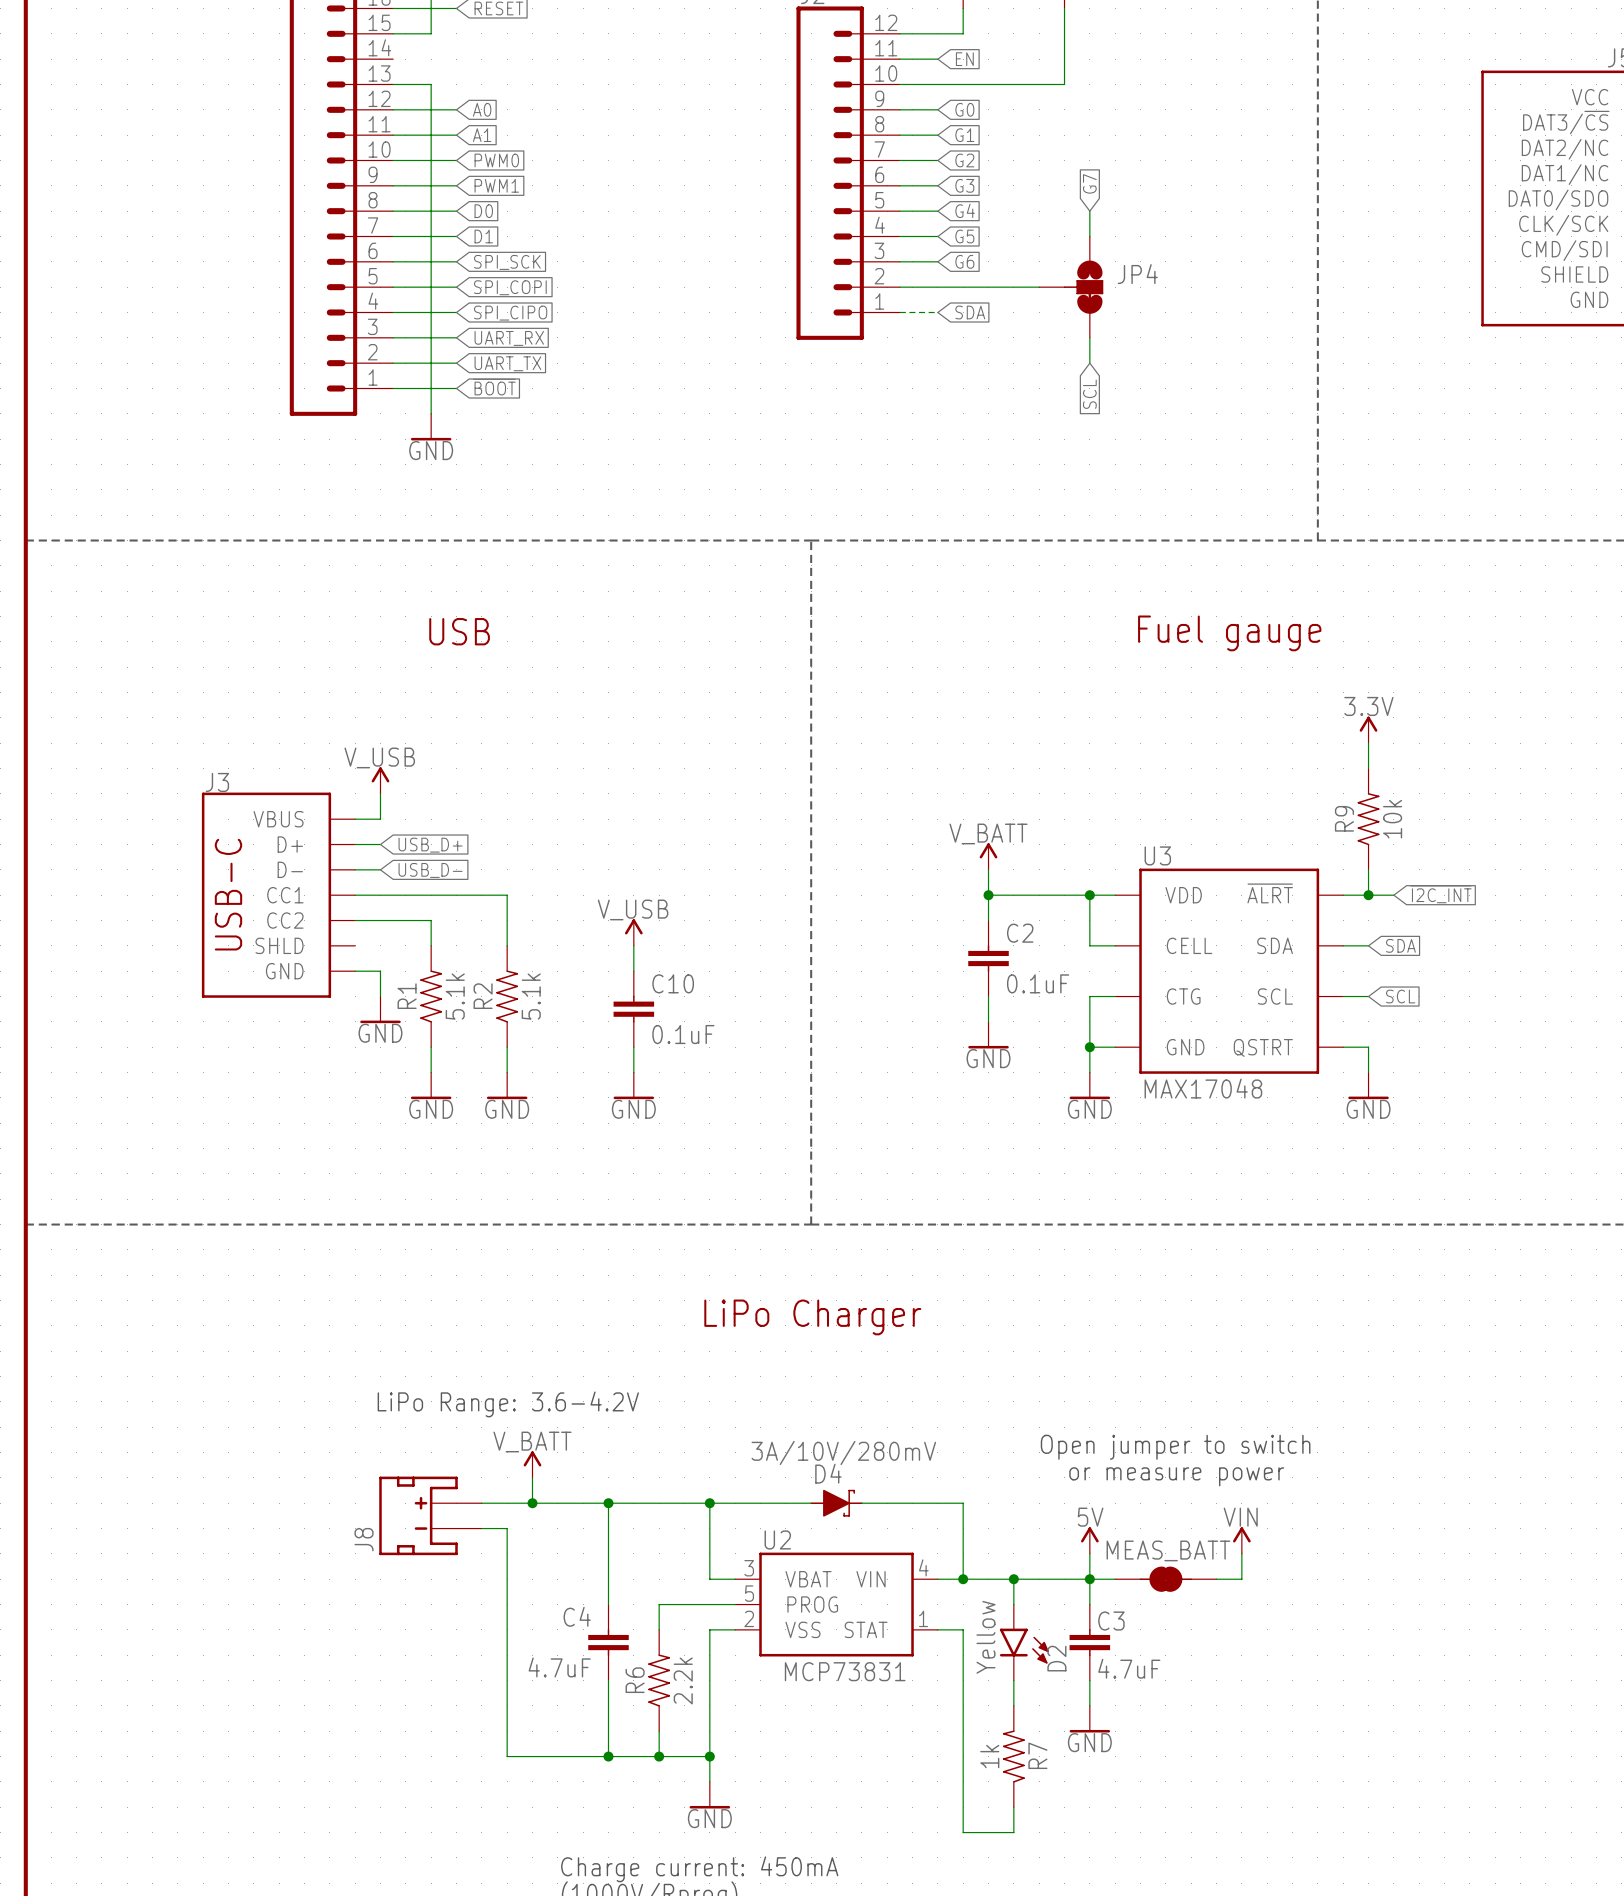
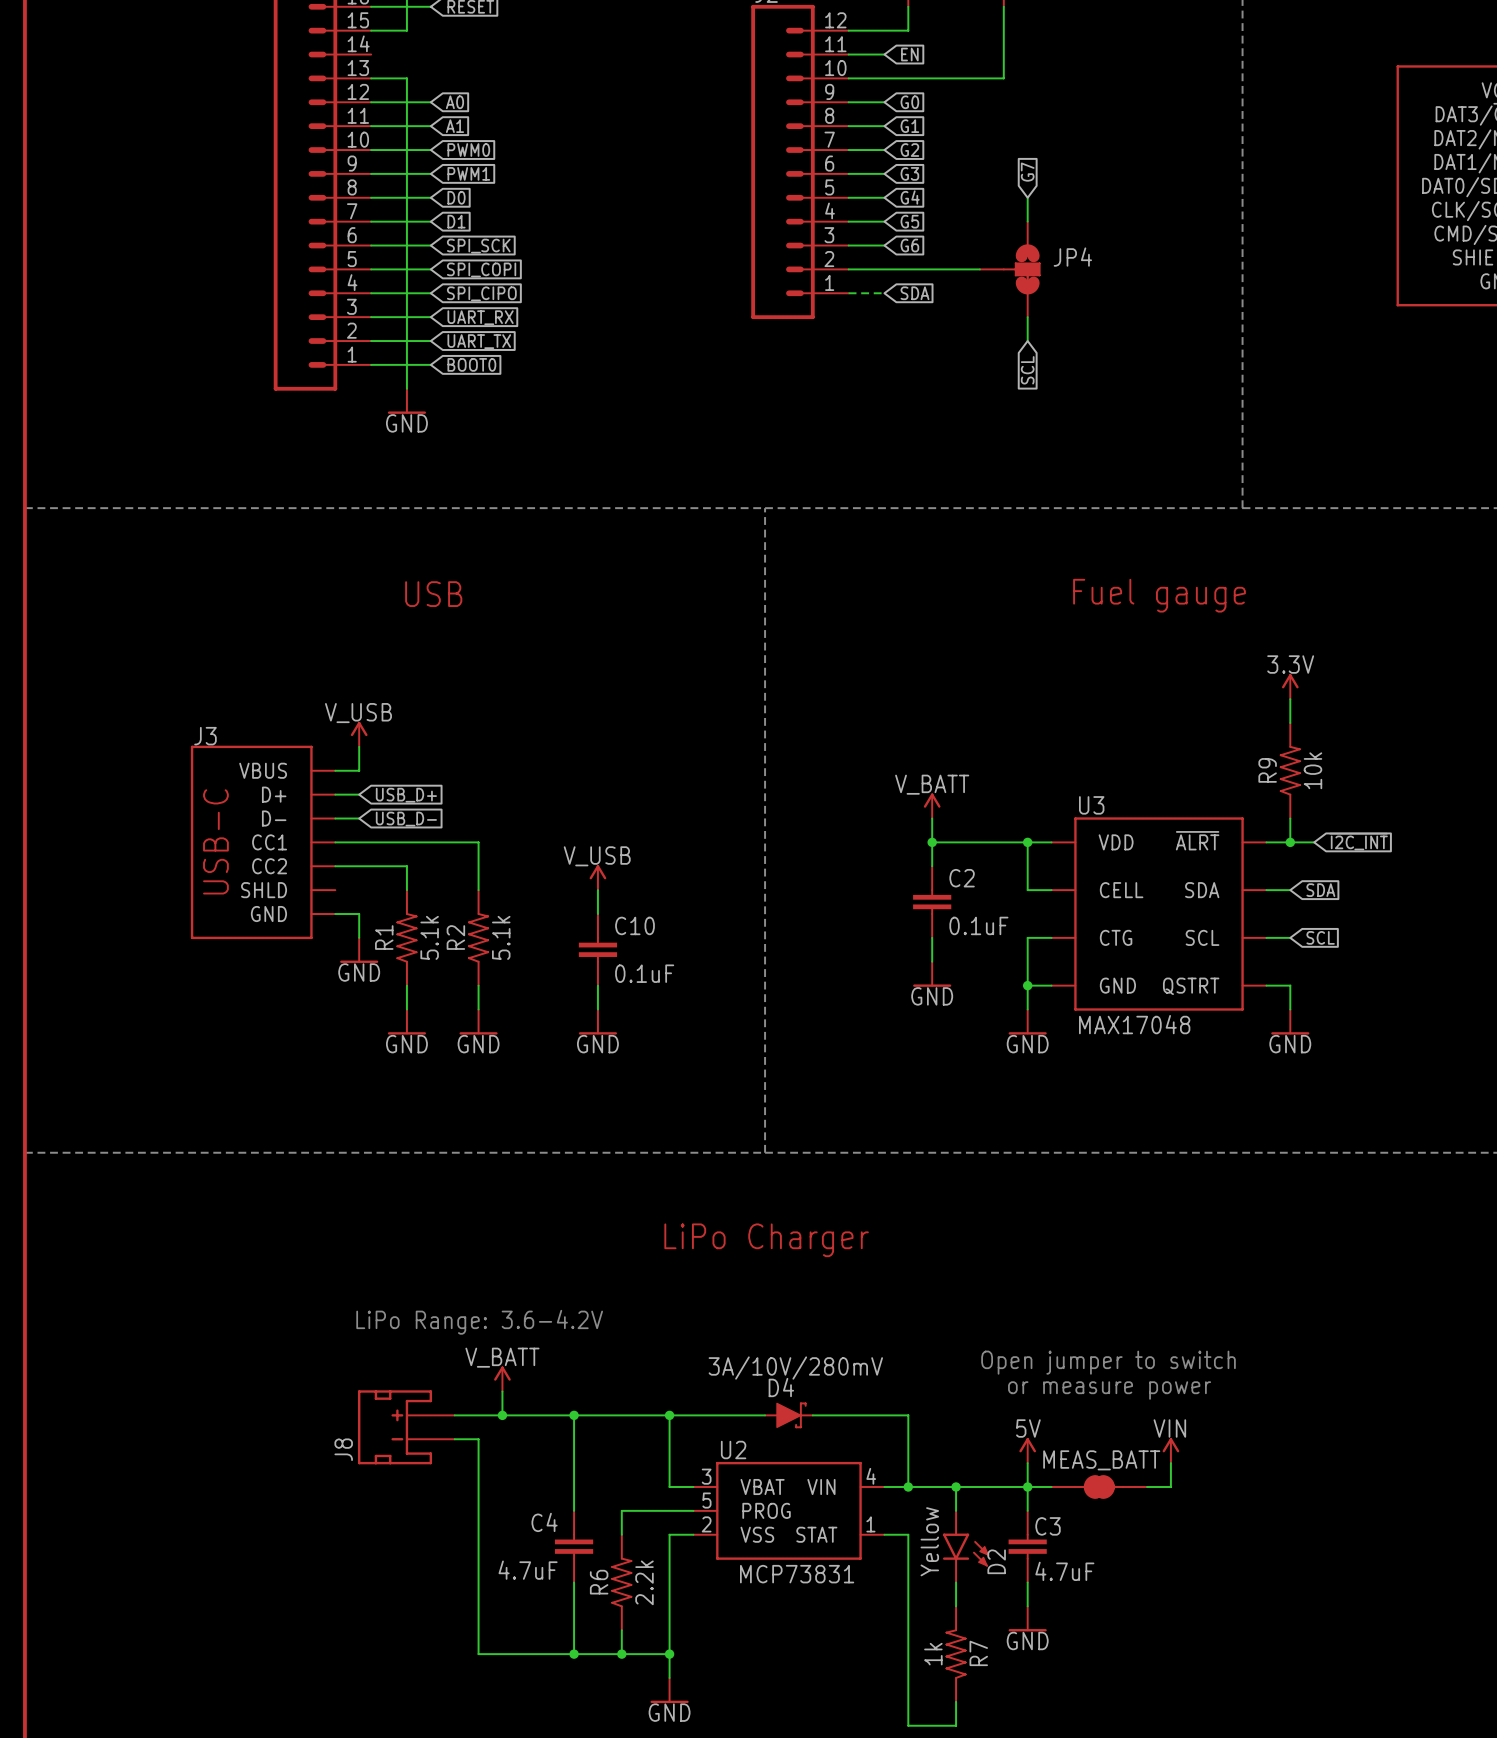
global label: ~{BOOT} (494, 387) -> BOOT0 (471, 364)

